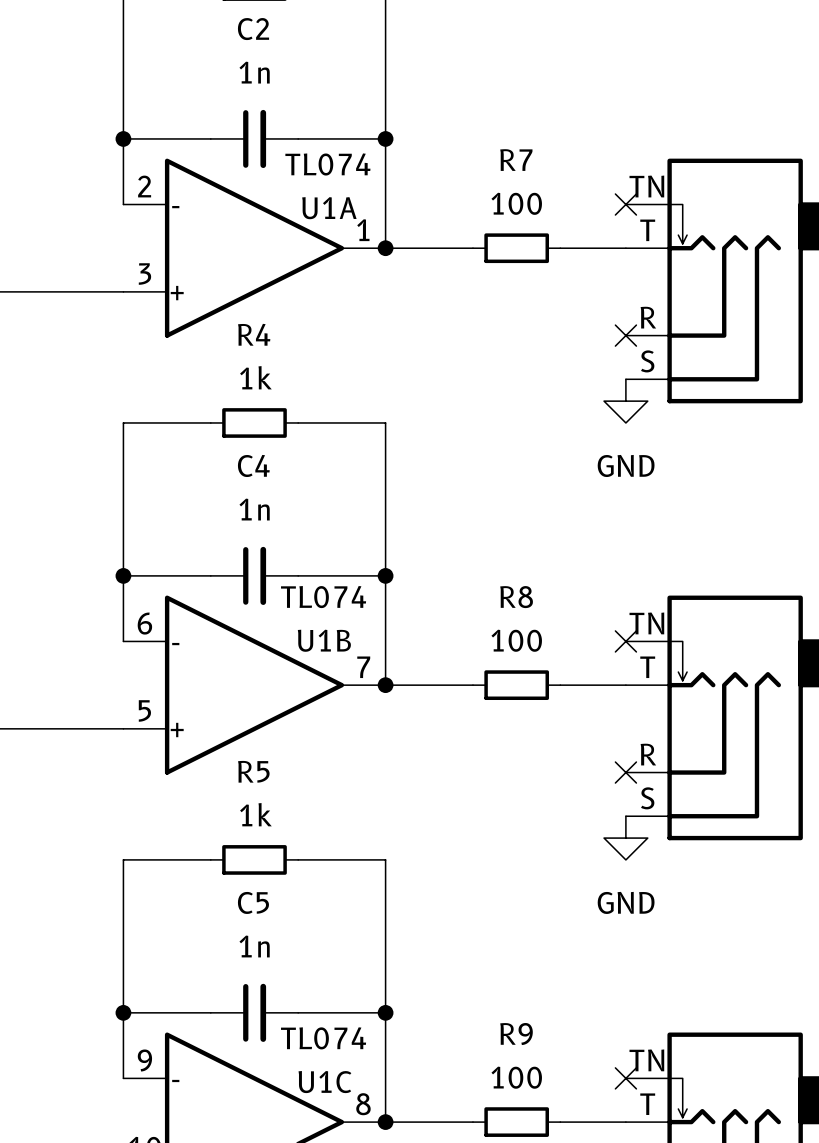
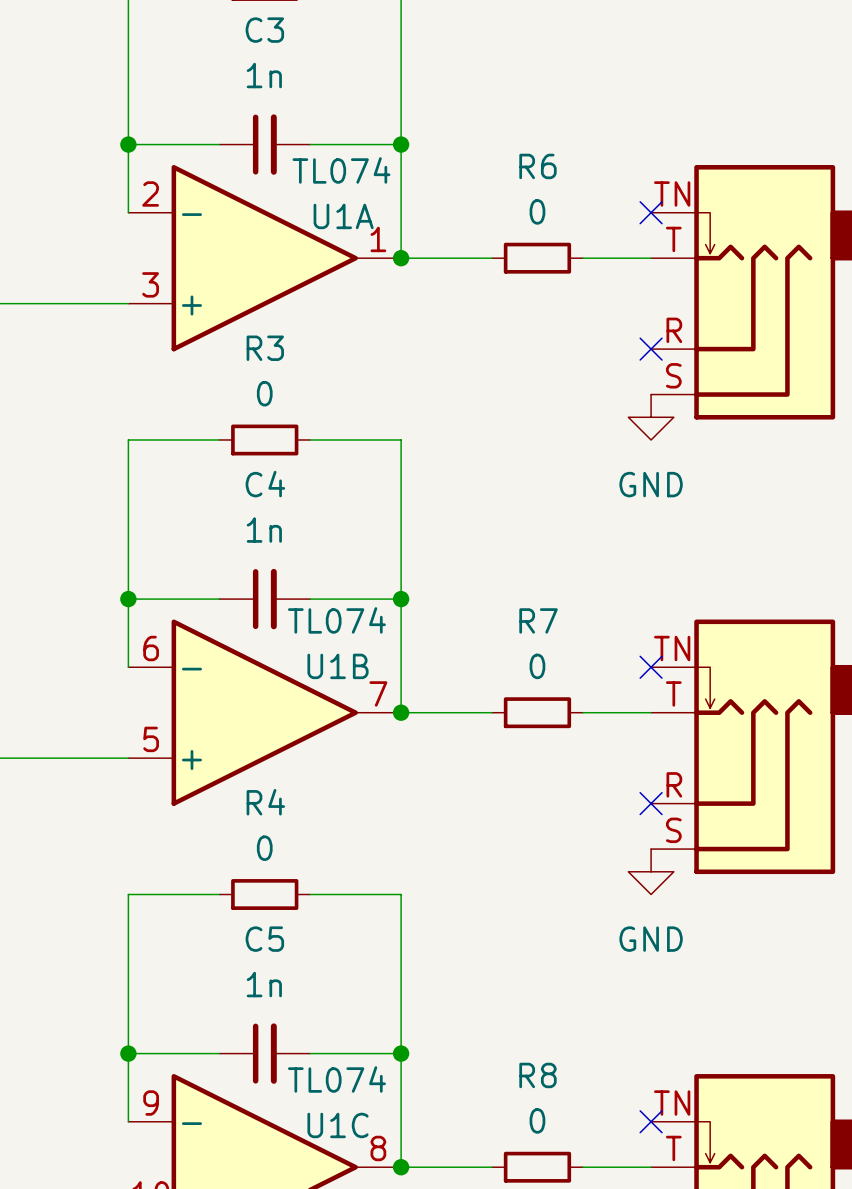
C2 name: C2 (253, 29) -> C3 (264, 30)
R7 name: R7 (516, 160) -> R6 (537, 166)
R7 value: 100 (516, 203) -> 0 (537, 211)
R4 name: R4 (254, 334) -> R3 (265, 348)
R4 value: 1k (255, 377) -> 0 (264, 393)
R8 name: R8 (516, 597) -> R7 (538, 620)
R8 value: 100 (516, 640) -> 0 (537, 666)
R5 name: R5 (253, 771) -> R4 (265, 802)
R5 value: 1k (255, 814) -> 0 (264, 848)
R9 name: R9 (516, 1034) -> R8 (537, 1075)
R9 value: 100 (516, 1077) -> 0 (537, 1120)

